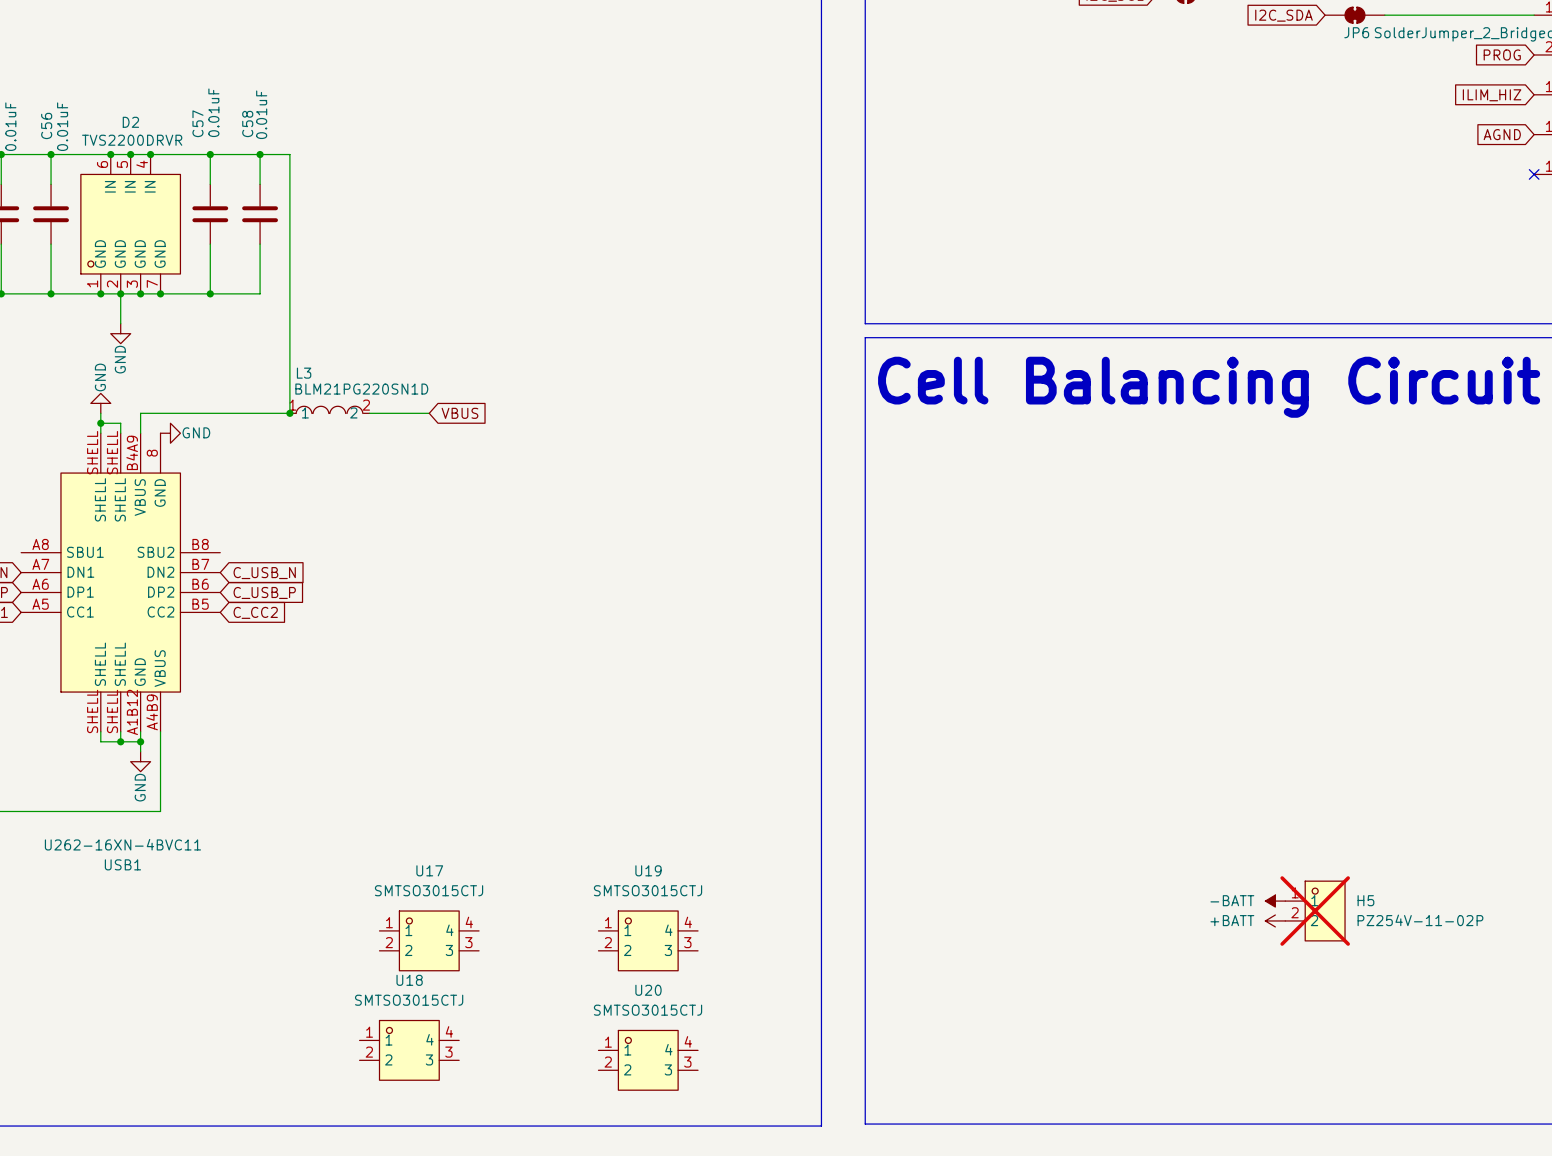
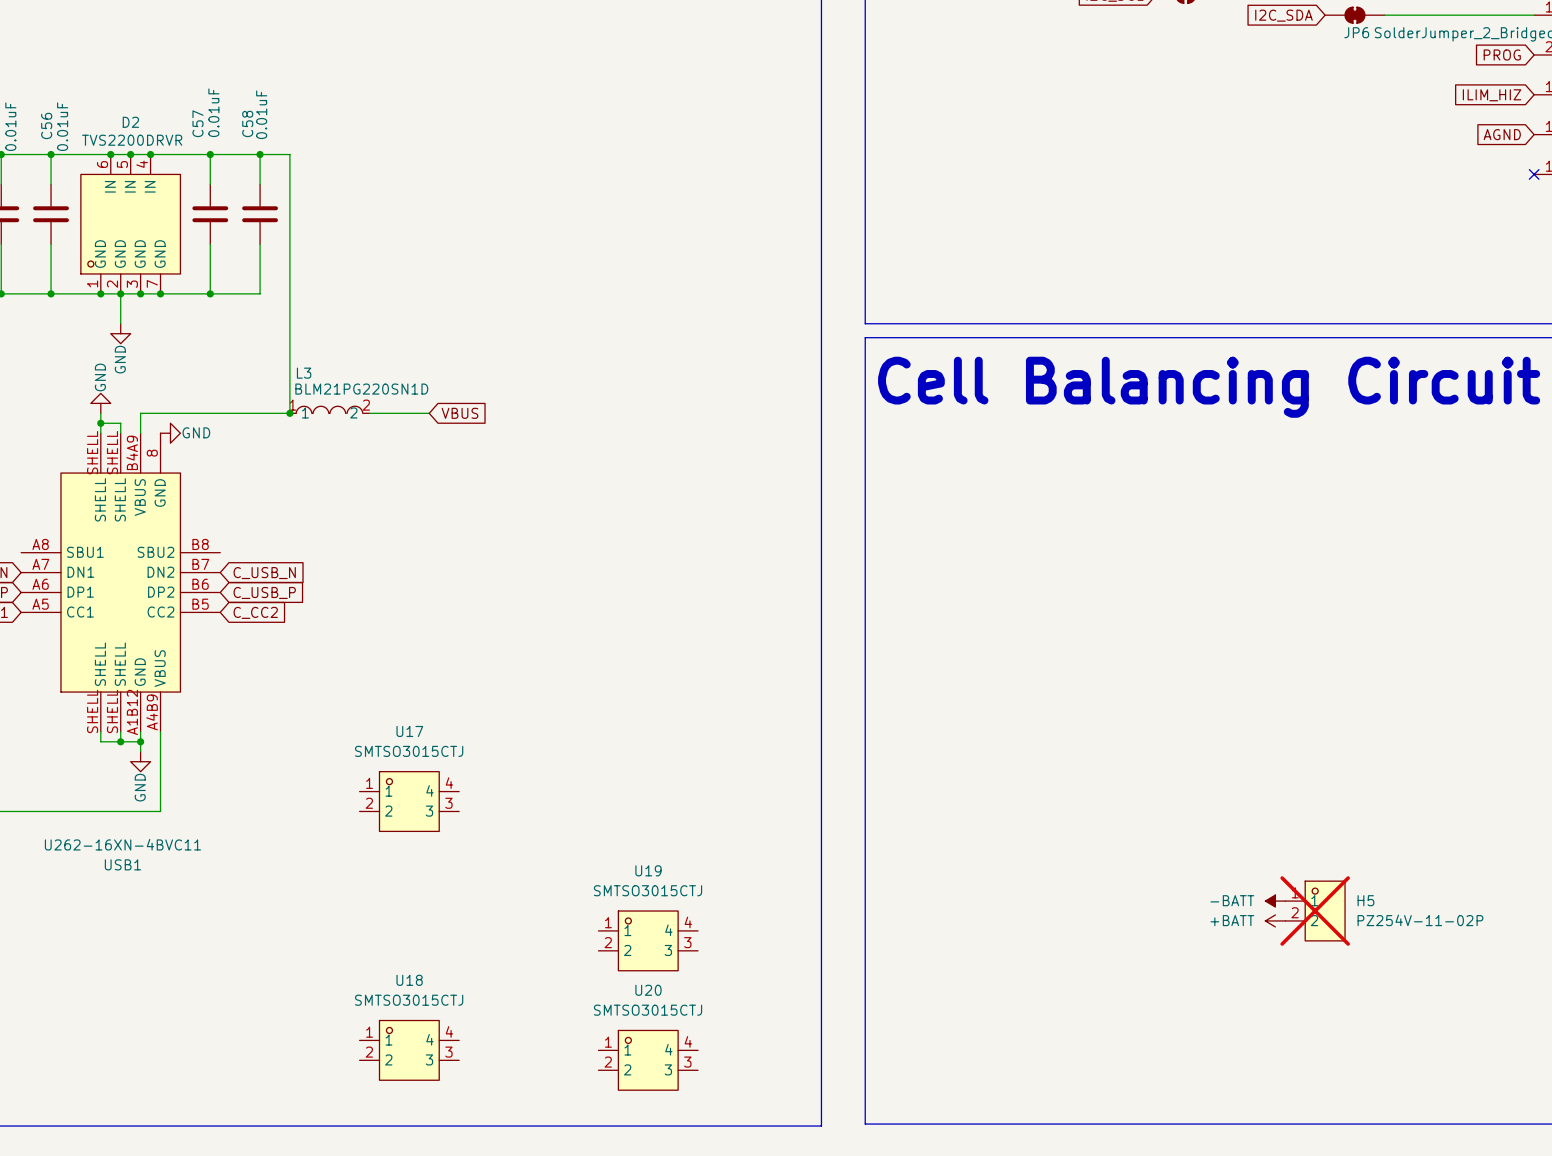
U17 position: (429, 940) -> (409, 801)

